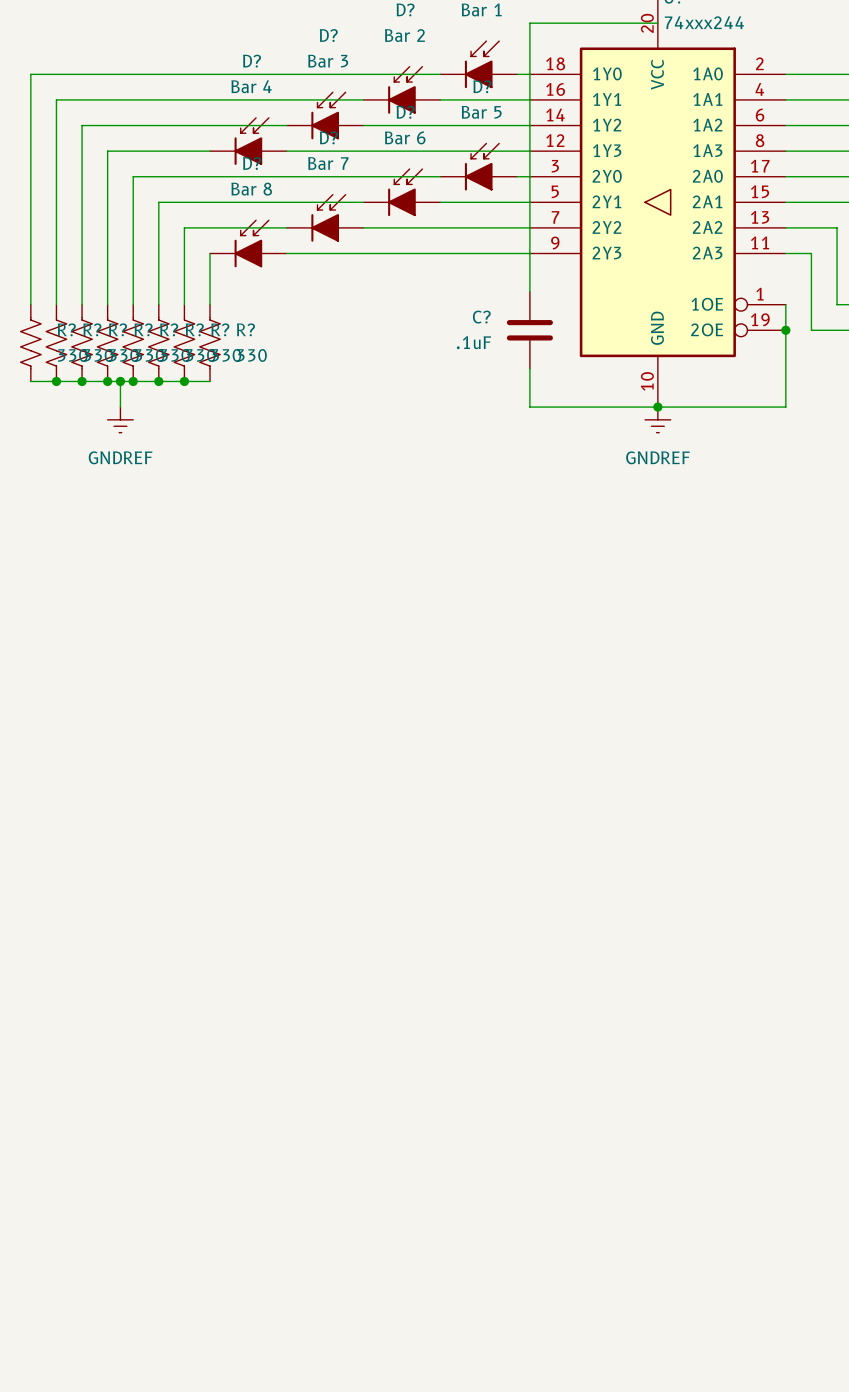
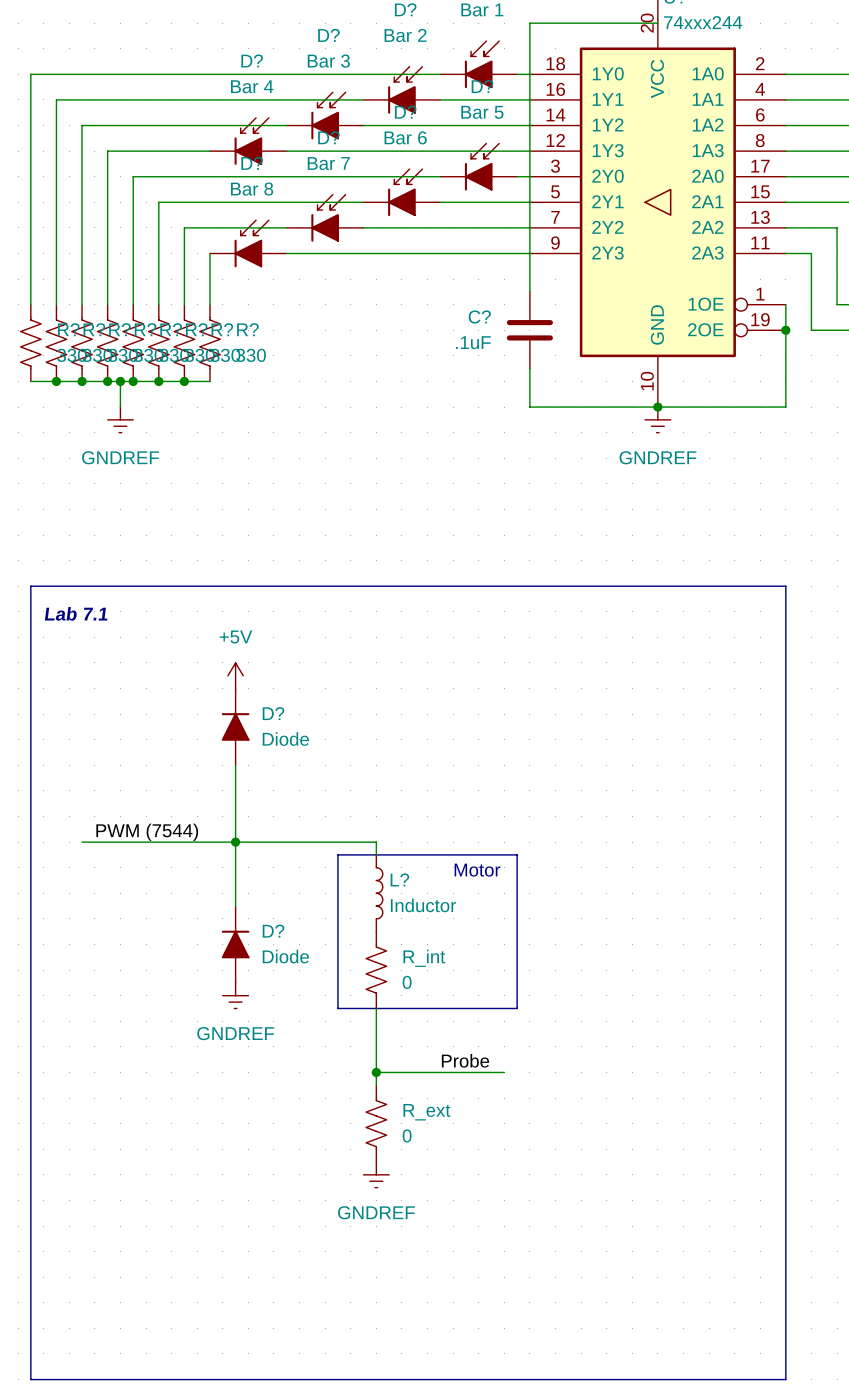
line: none -> (30, 586) (30, 1379) (785, 1379) (785, 586) (30, 586)
text: none -> Lab 7.1 (76, 613)
power symbol: none -> +5V (235, 675)
D?: none -> Diode (235, 726)
wire: none -> (235, 765) (235, 906)
label: none -> PWM (7544) (147, 832)
wire: none -> (82, 842) (376, 842) (376, 854)
junction: none -> (235, 842)
line: none -> (337, 854) (337, 1008) (517, 1008) (517, 854) (337, 854)
text: none -> Motor (477, 870)
L?: none -> Inductor (379, 893)
D?: none -> Diode (235, 944)
R_int: none -> 0 (376, 970)
power symbol: none -> GNDREF (235, 995)
wire: none -> (376, 1008) (376, 1085)
label: none -> Probe (465, 1060)
wire: none -> (376, 1072) (504, 1072)
junction: none -> (376, 1072)
R_ext: none -> 0 (376, 1123)
power symbol: none -> GNDREF (376, 1174)

